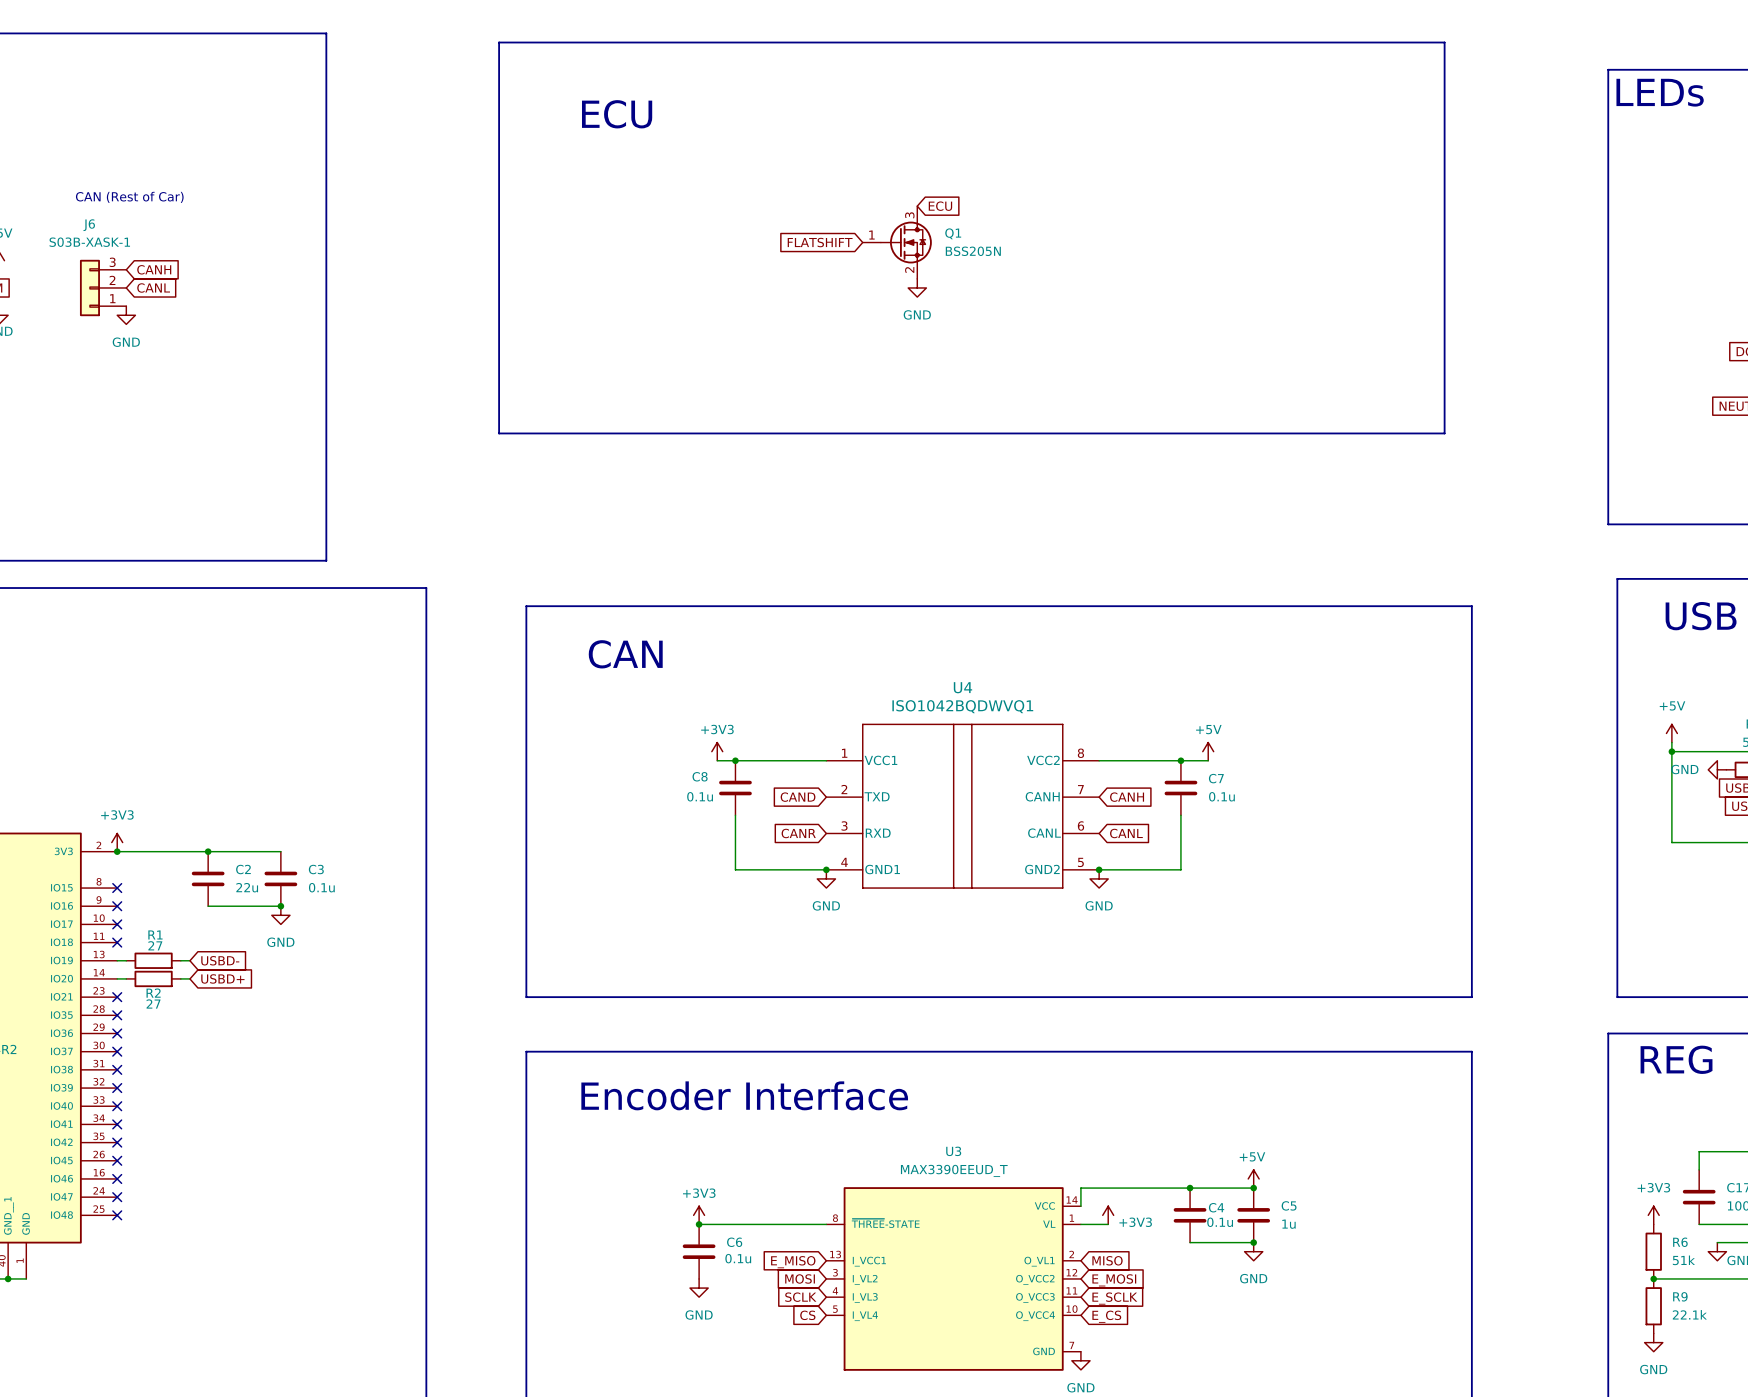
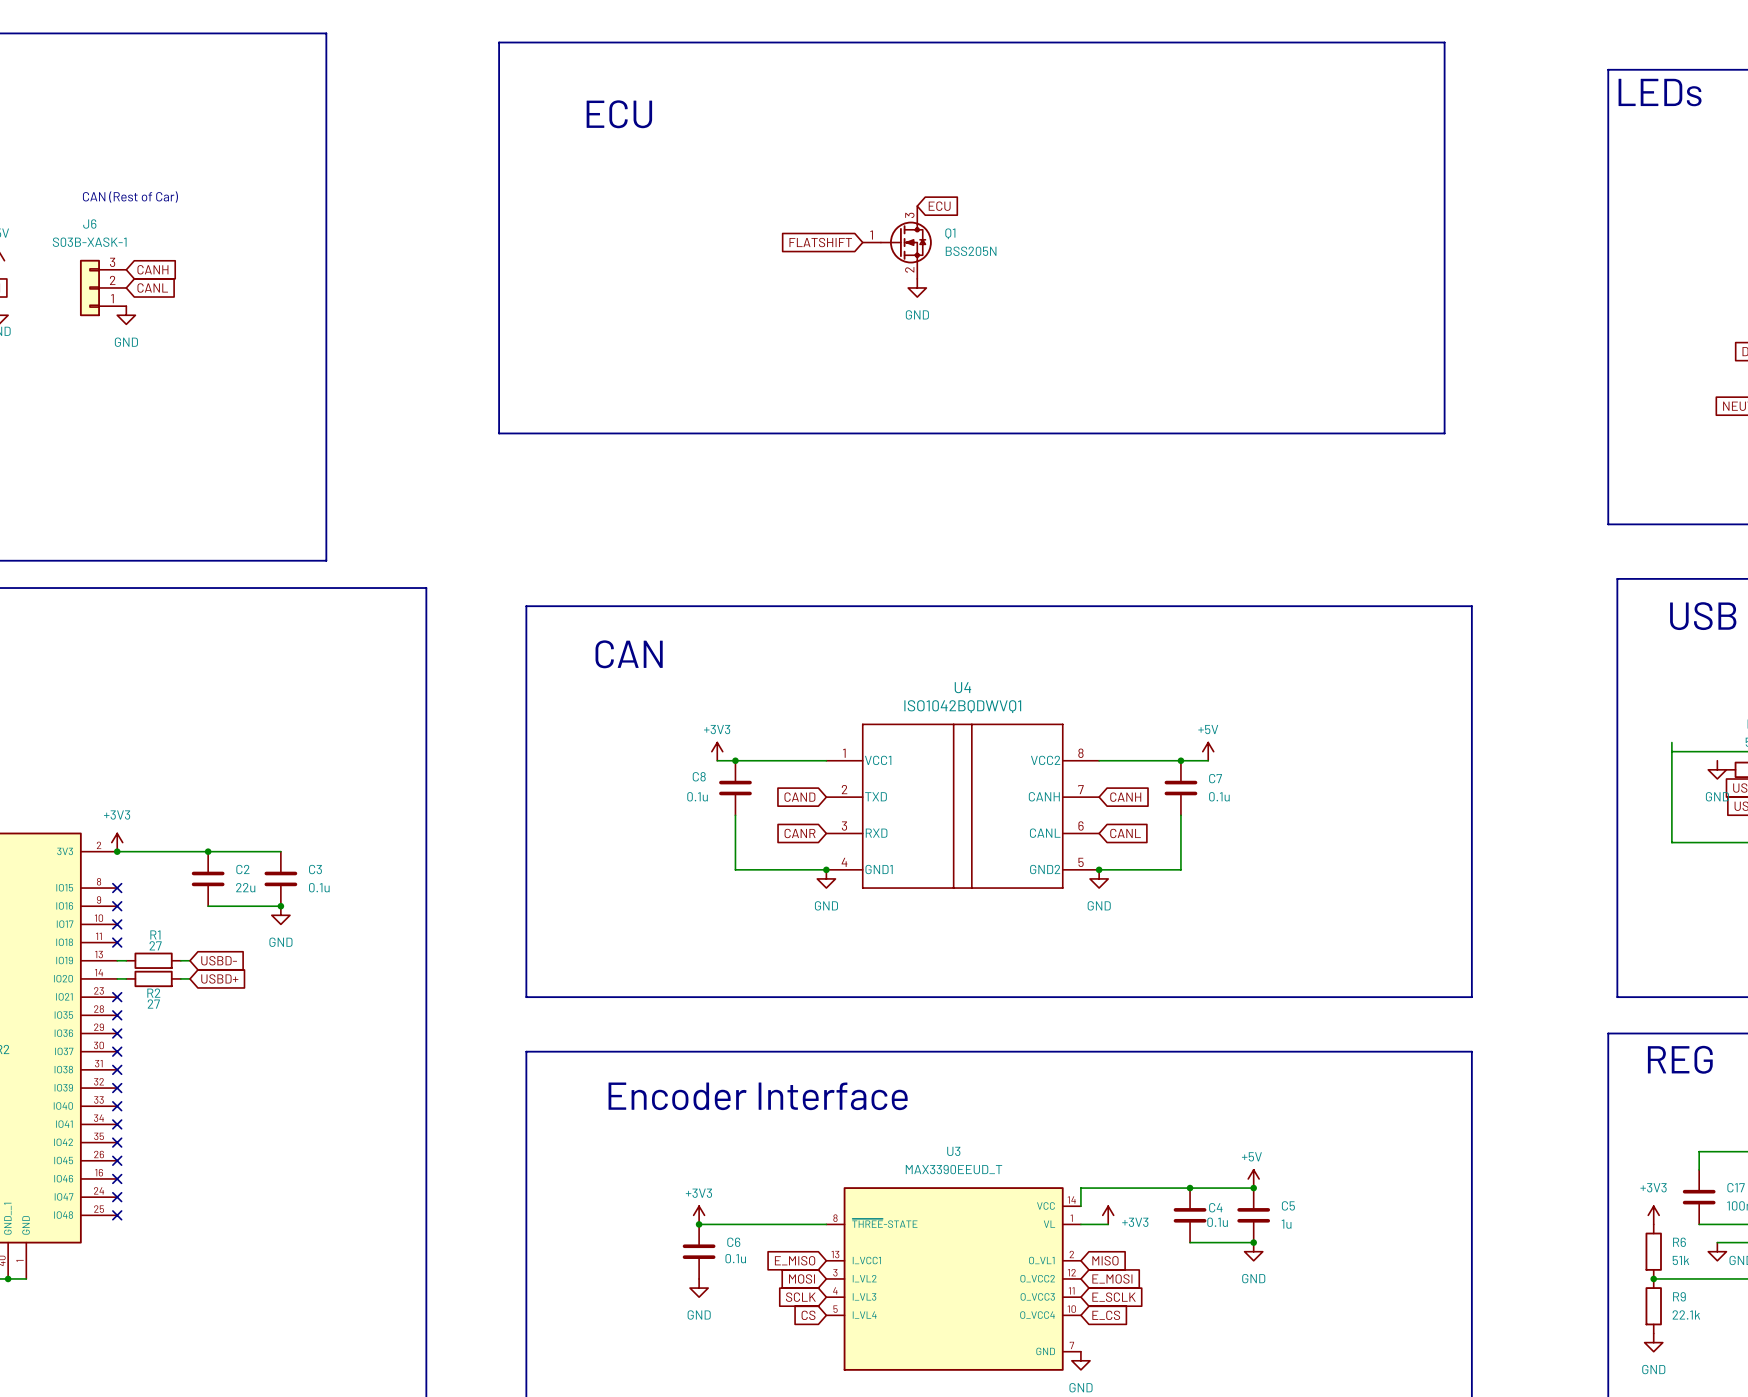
power symbol: +5V (1671, 733) -> none
junction: (1671, 751) -> none
power symbol rotation: 0° (1717, 769) -> 90° counterclockwise (1717, 769)

